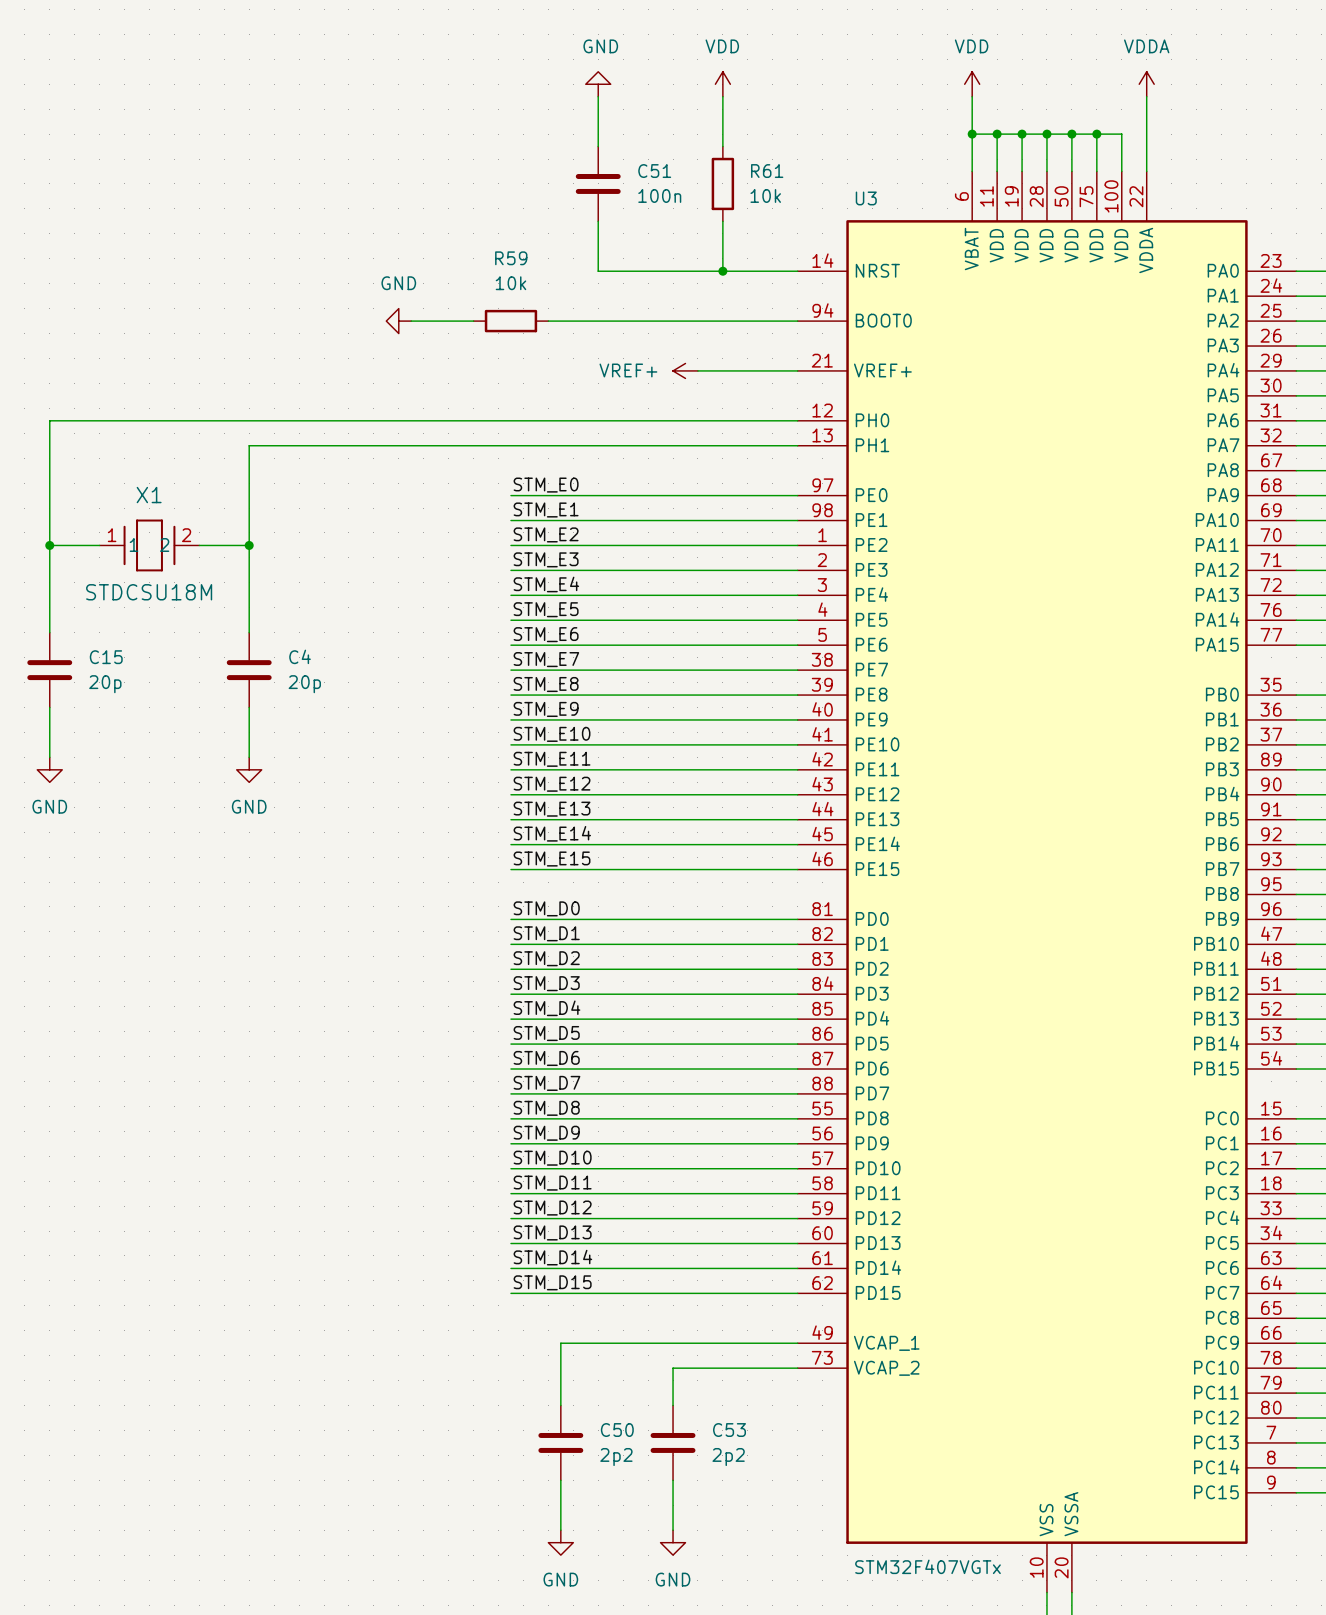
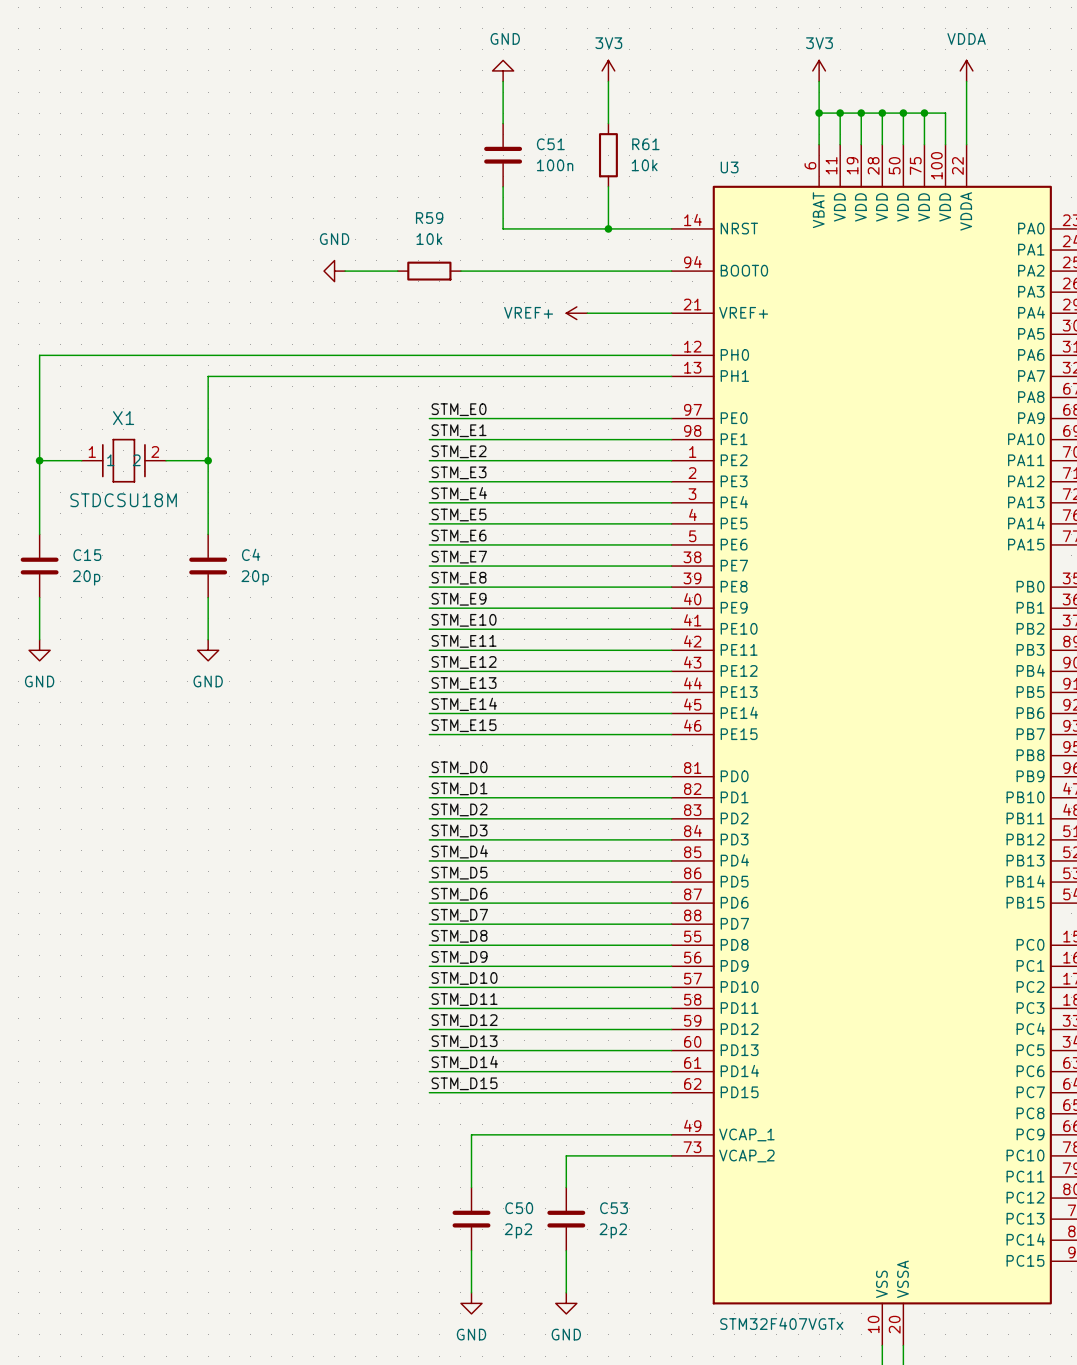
power symbol: VDD (722, 84) -> 3V3 (608, 70)
power symbol: VDD (972, 84) -> 3V3 (819, 70)

